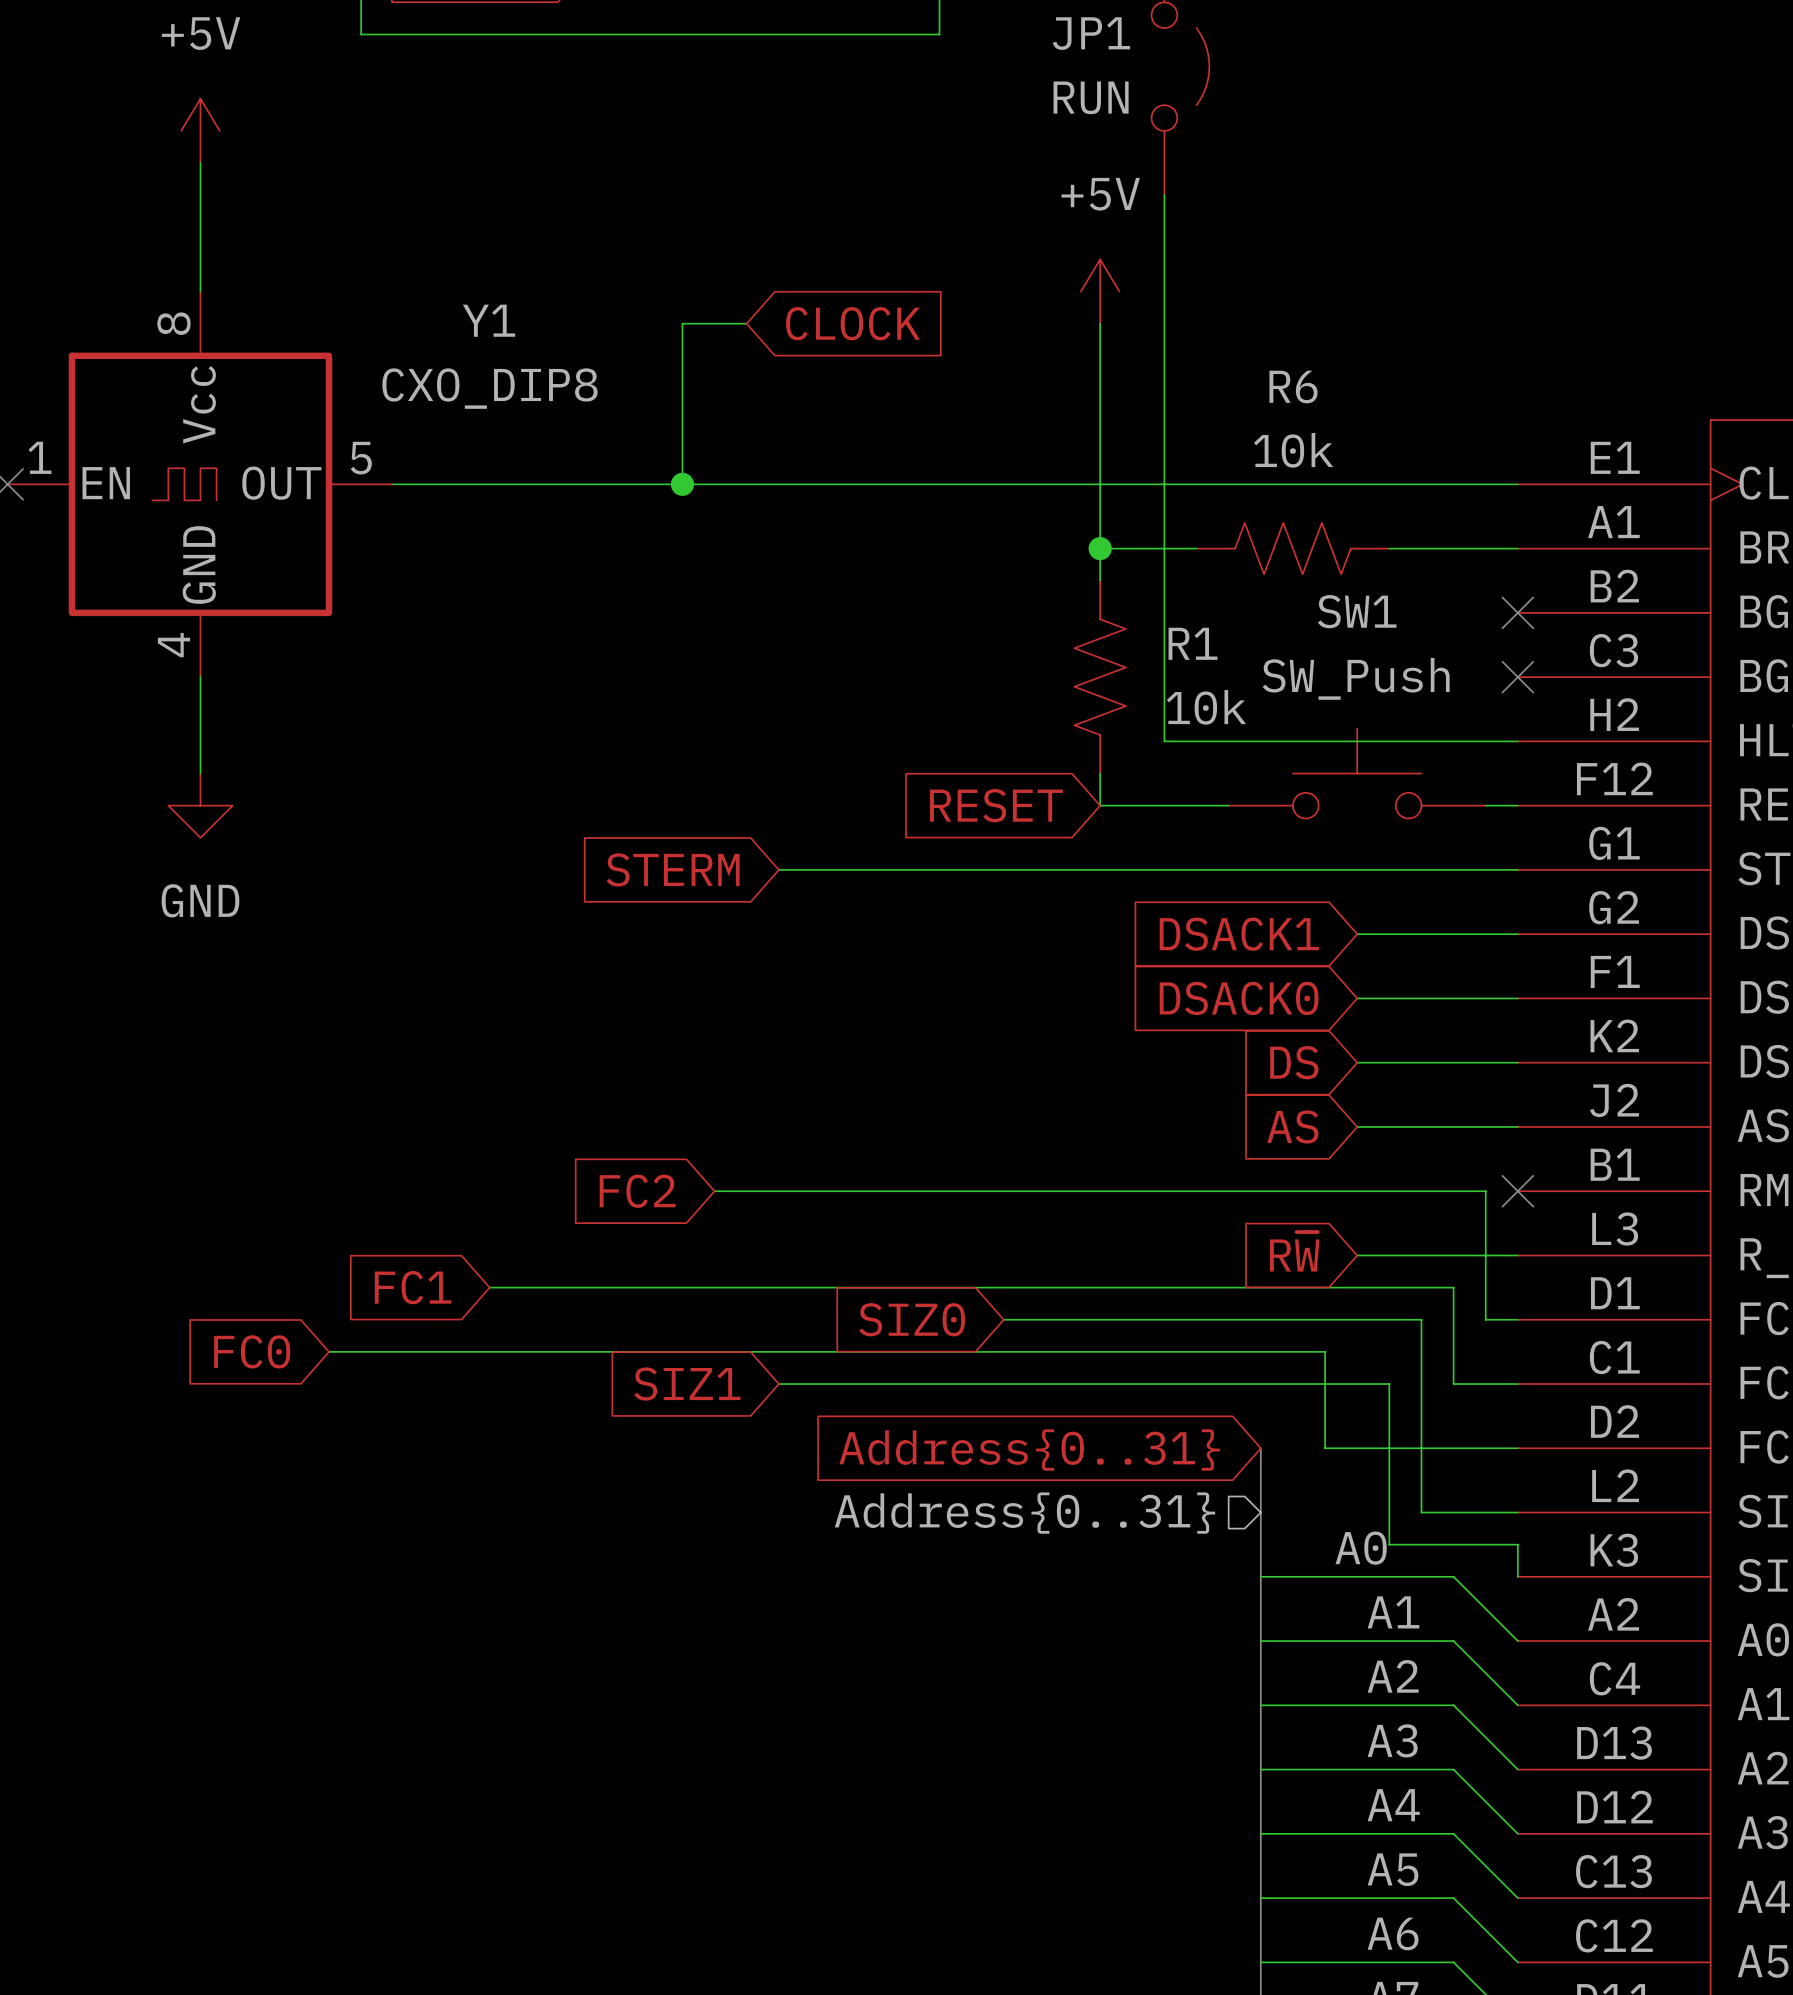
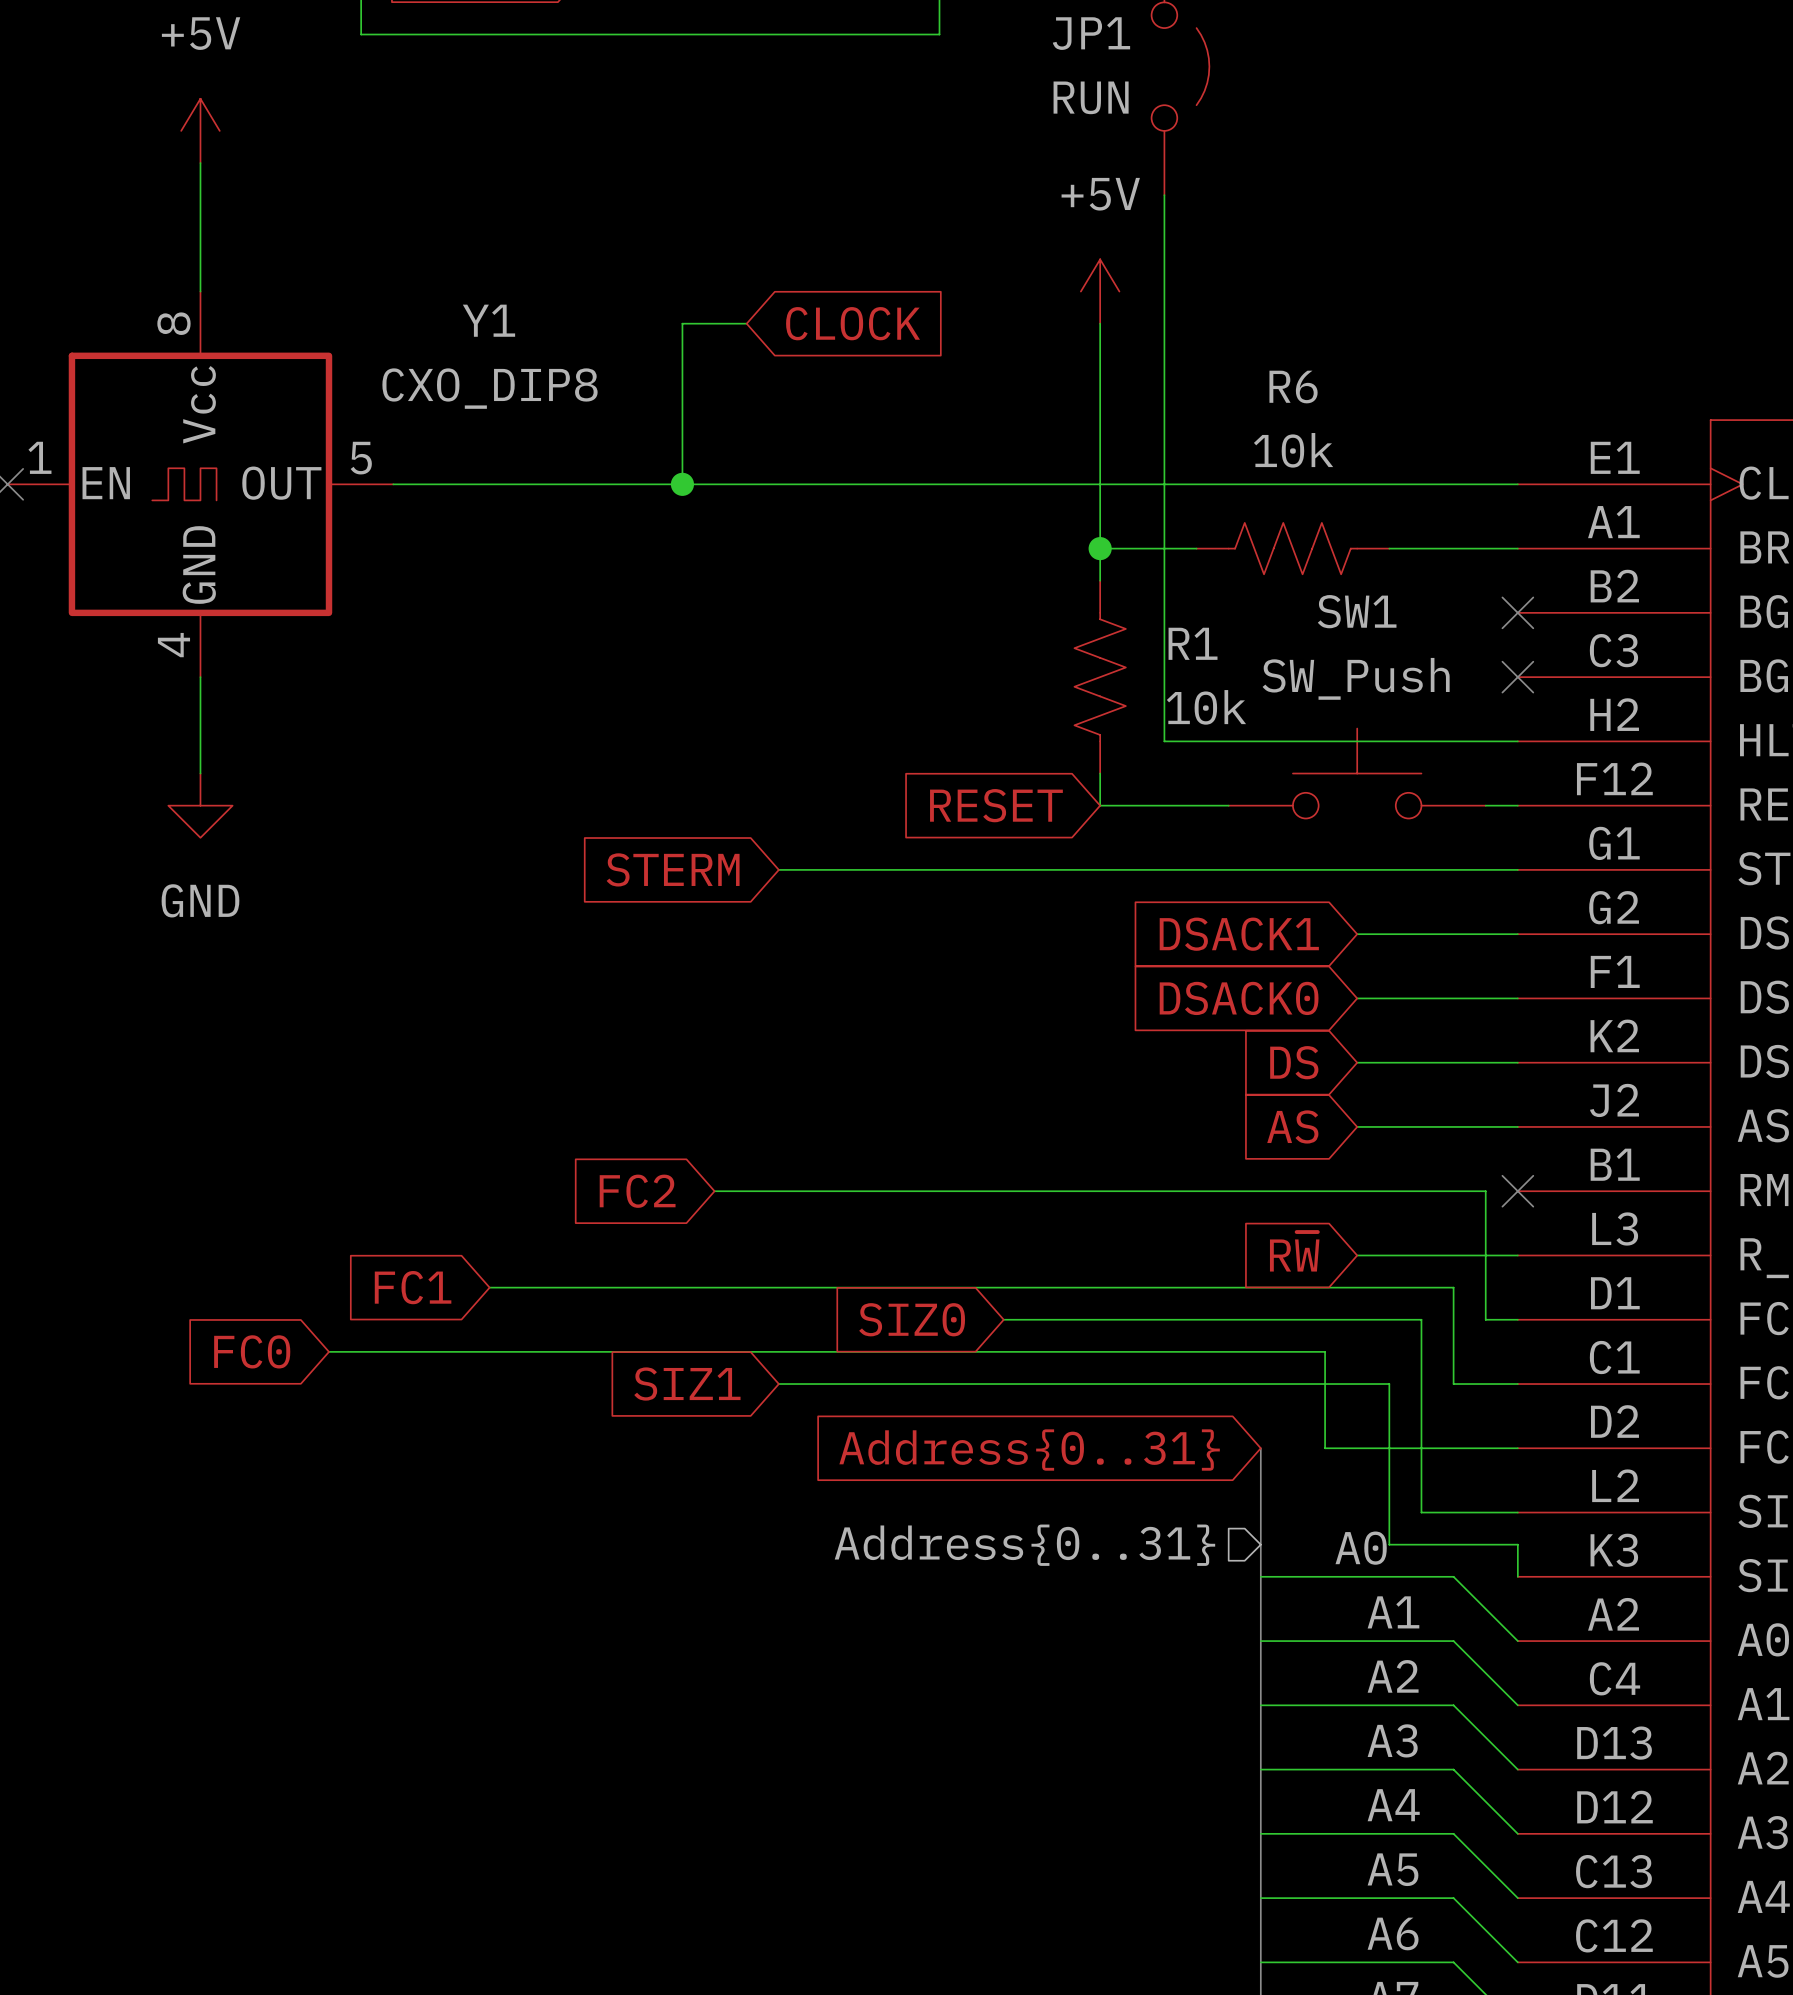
hierarchical label position: Address{0..31} (1024, 1513) -> Address{0..31} (1024, 1545)

